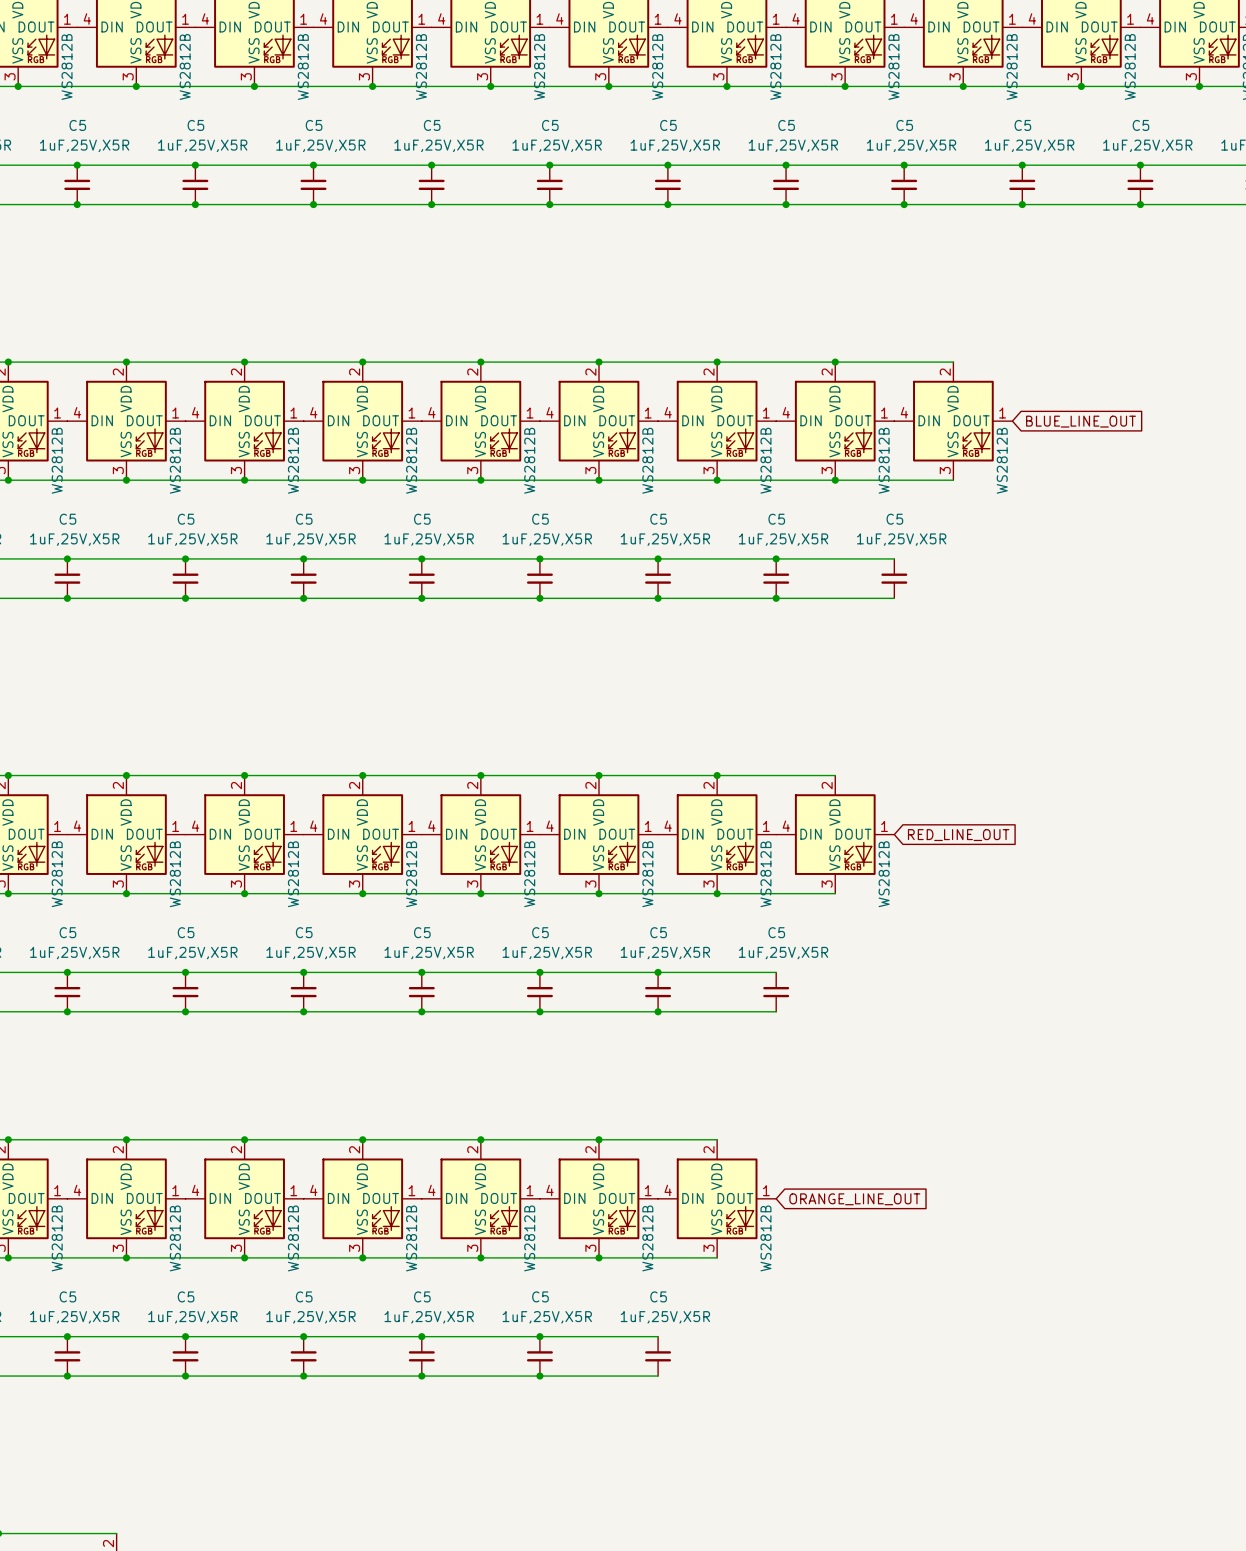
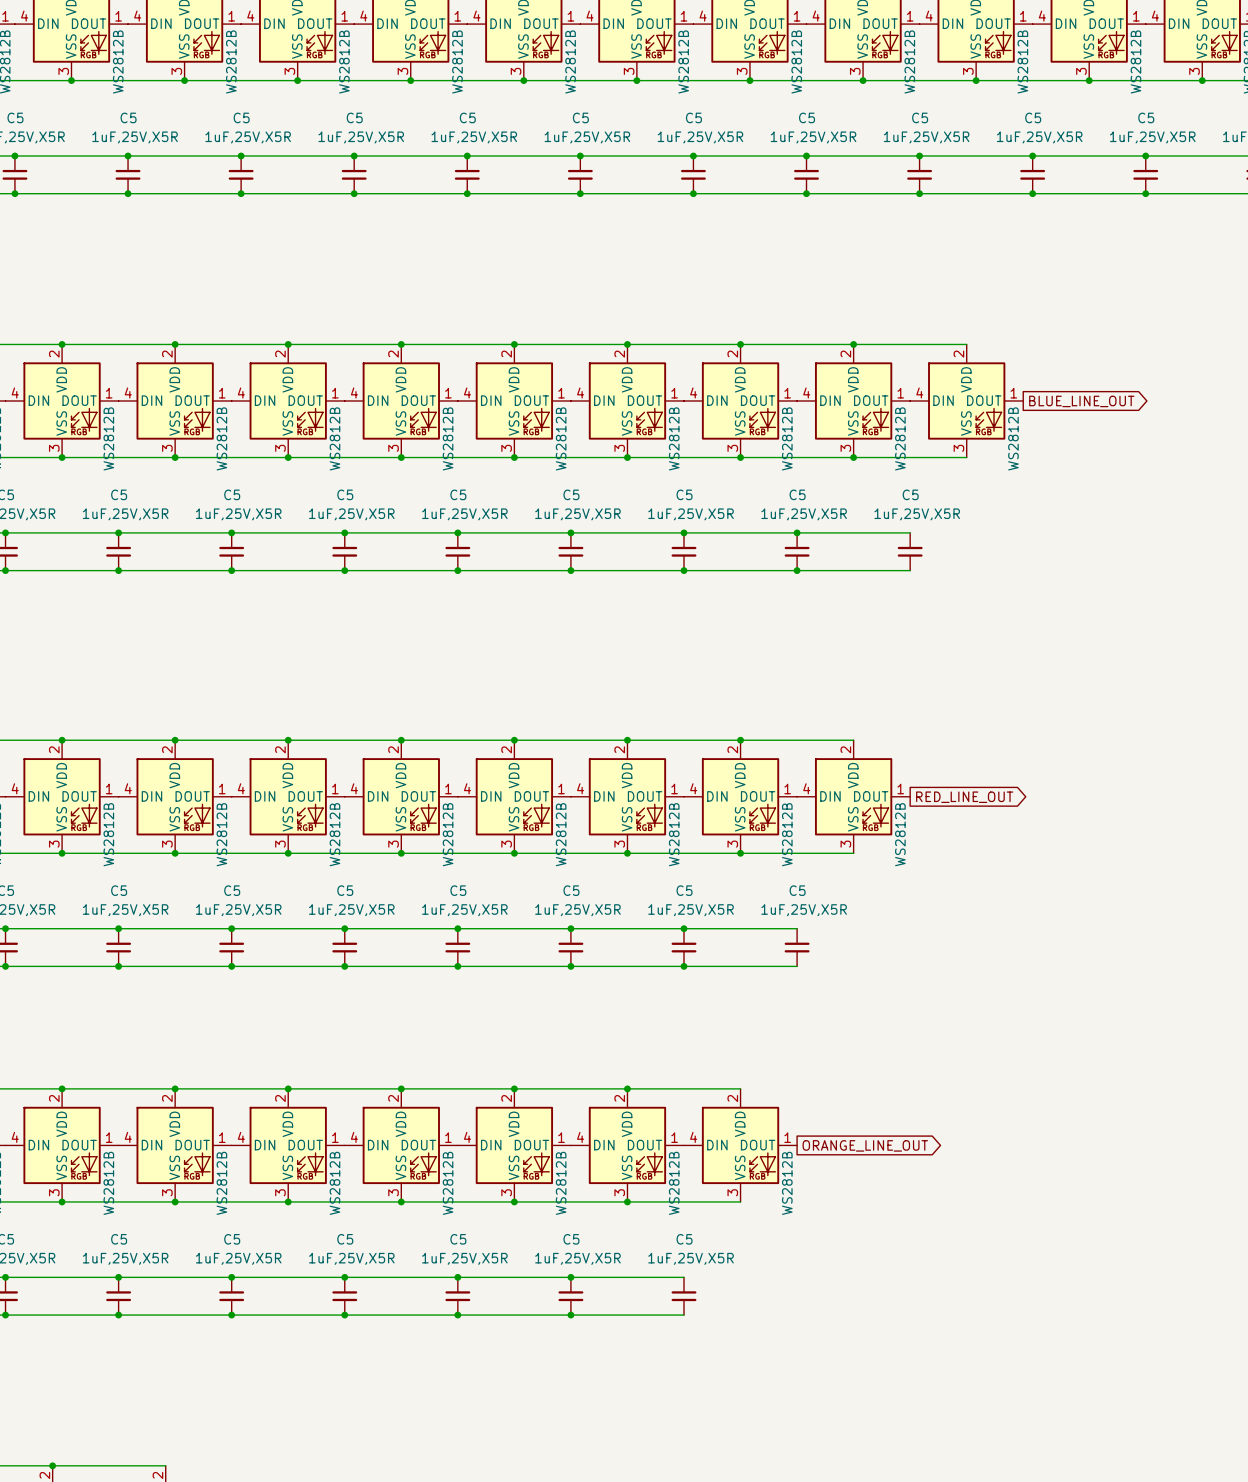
global label shape: input (1081, 421) -> output (1081, 401)
global label shape: input (958, 835) -> output (964, 797)
global label shape: input (854, 1199) -> output (865, 1145)

